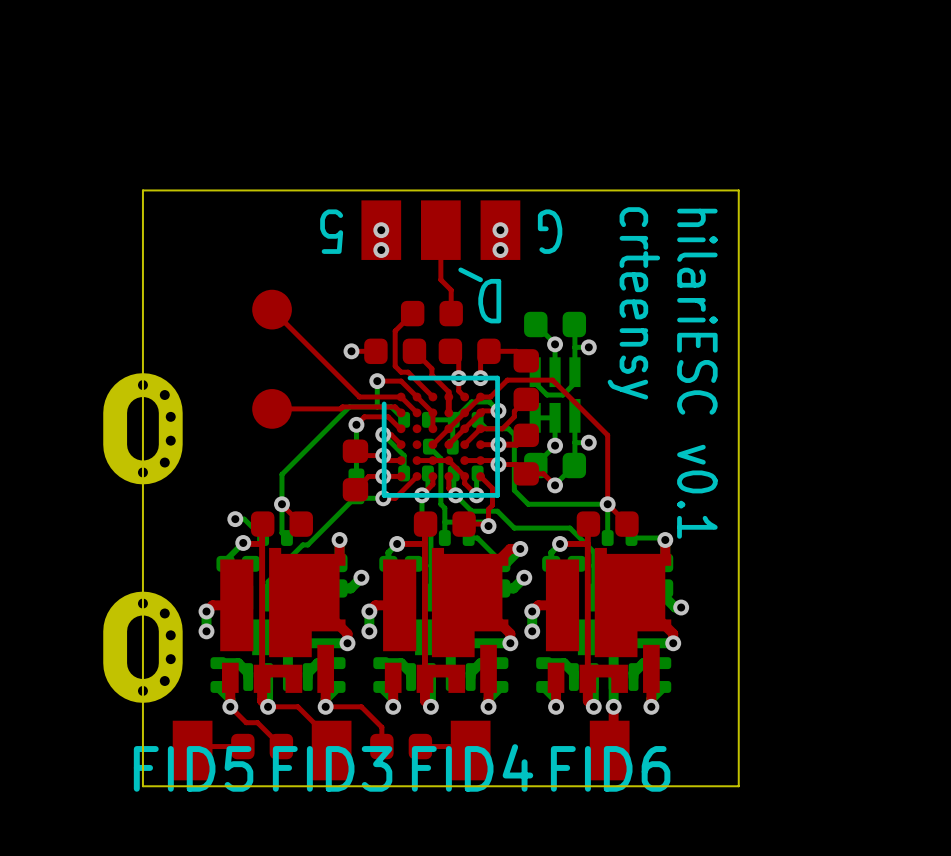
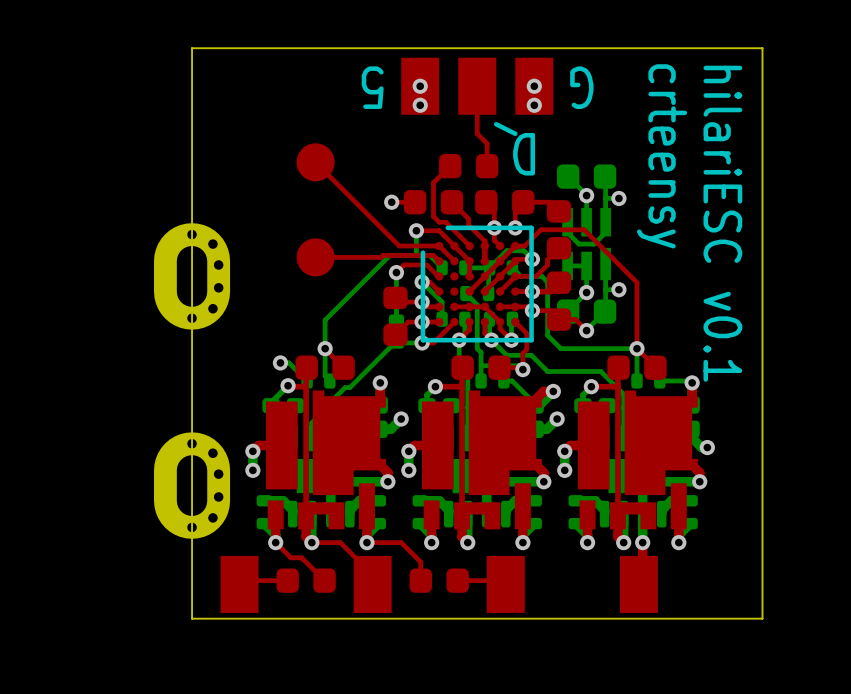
FID4 name: FID4 (472, 767) -> none
FID5 name: FID5 (193, 768) -> none
FID3 name: FID3 (332, 768) -> none
FID6 name: FID6 (610, 768) -> none

